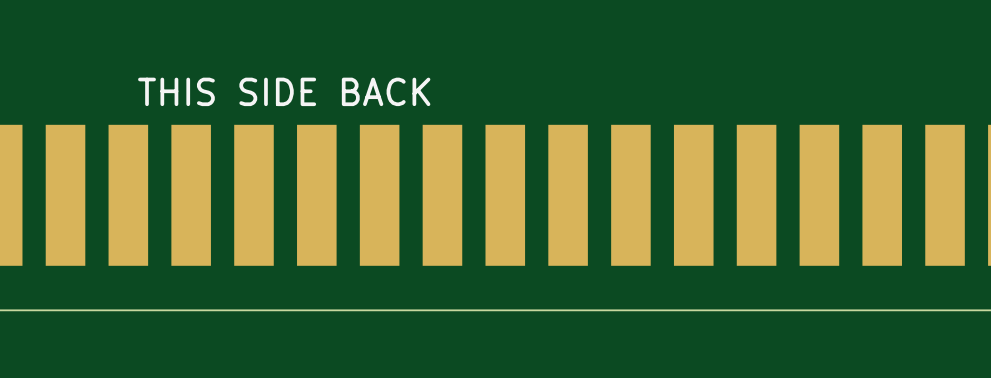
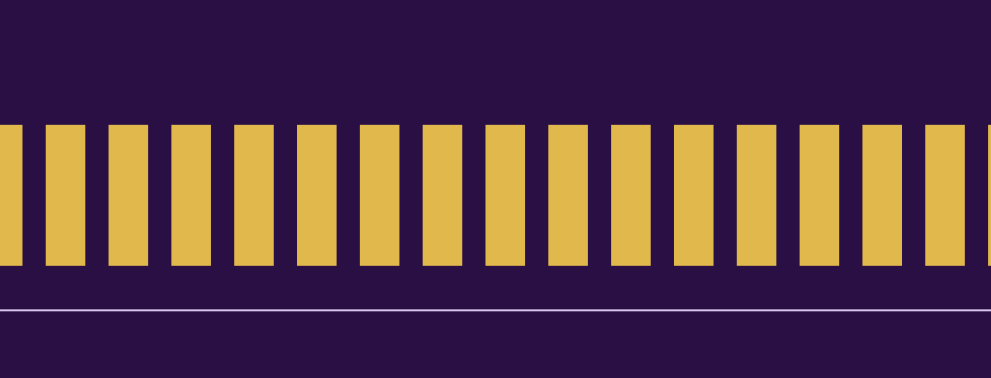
text: THIS SIDE BACK (284, 91) -> none

